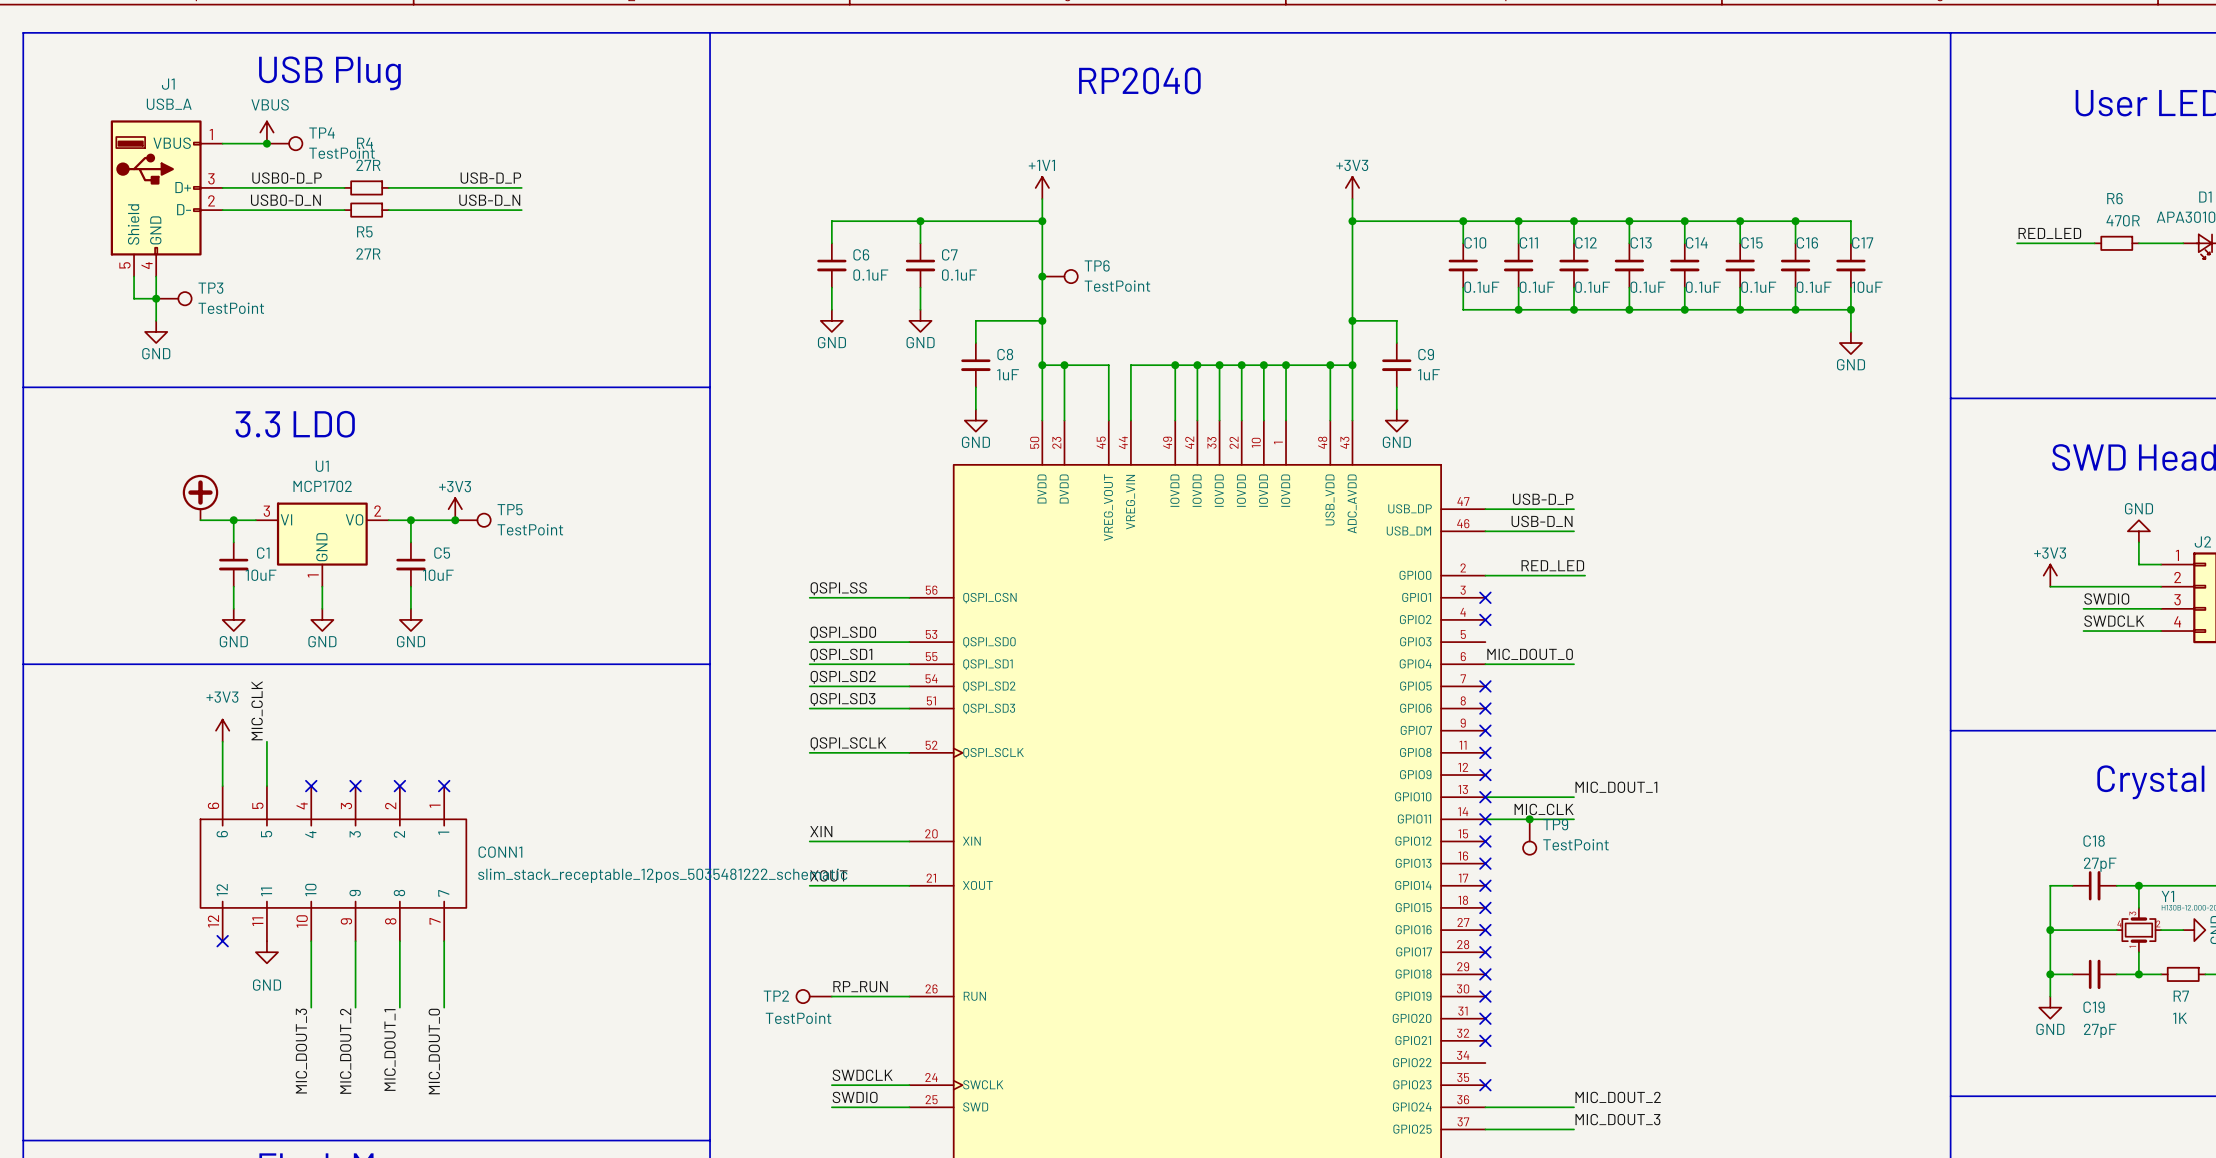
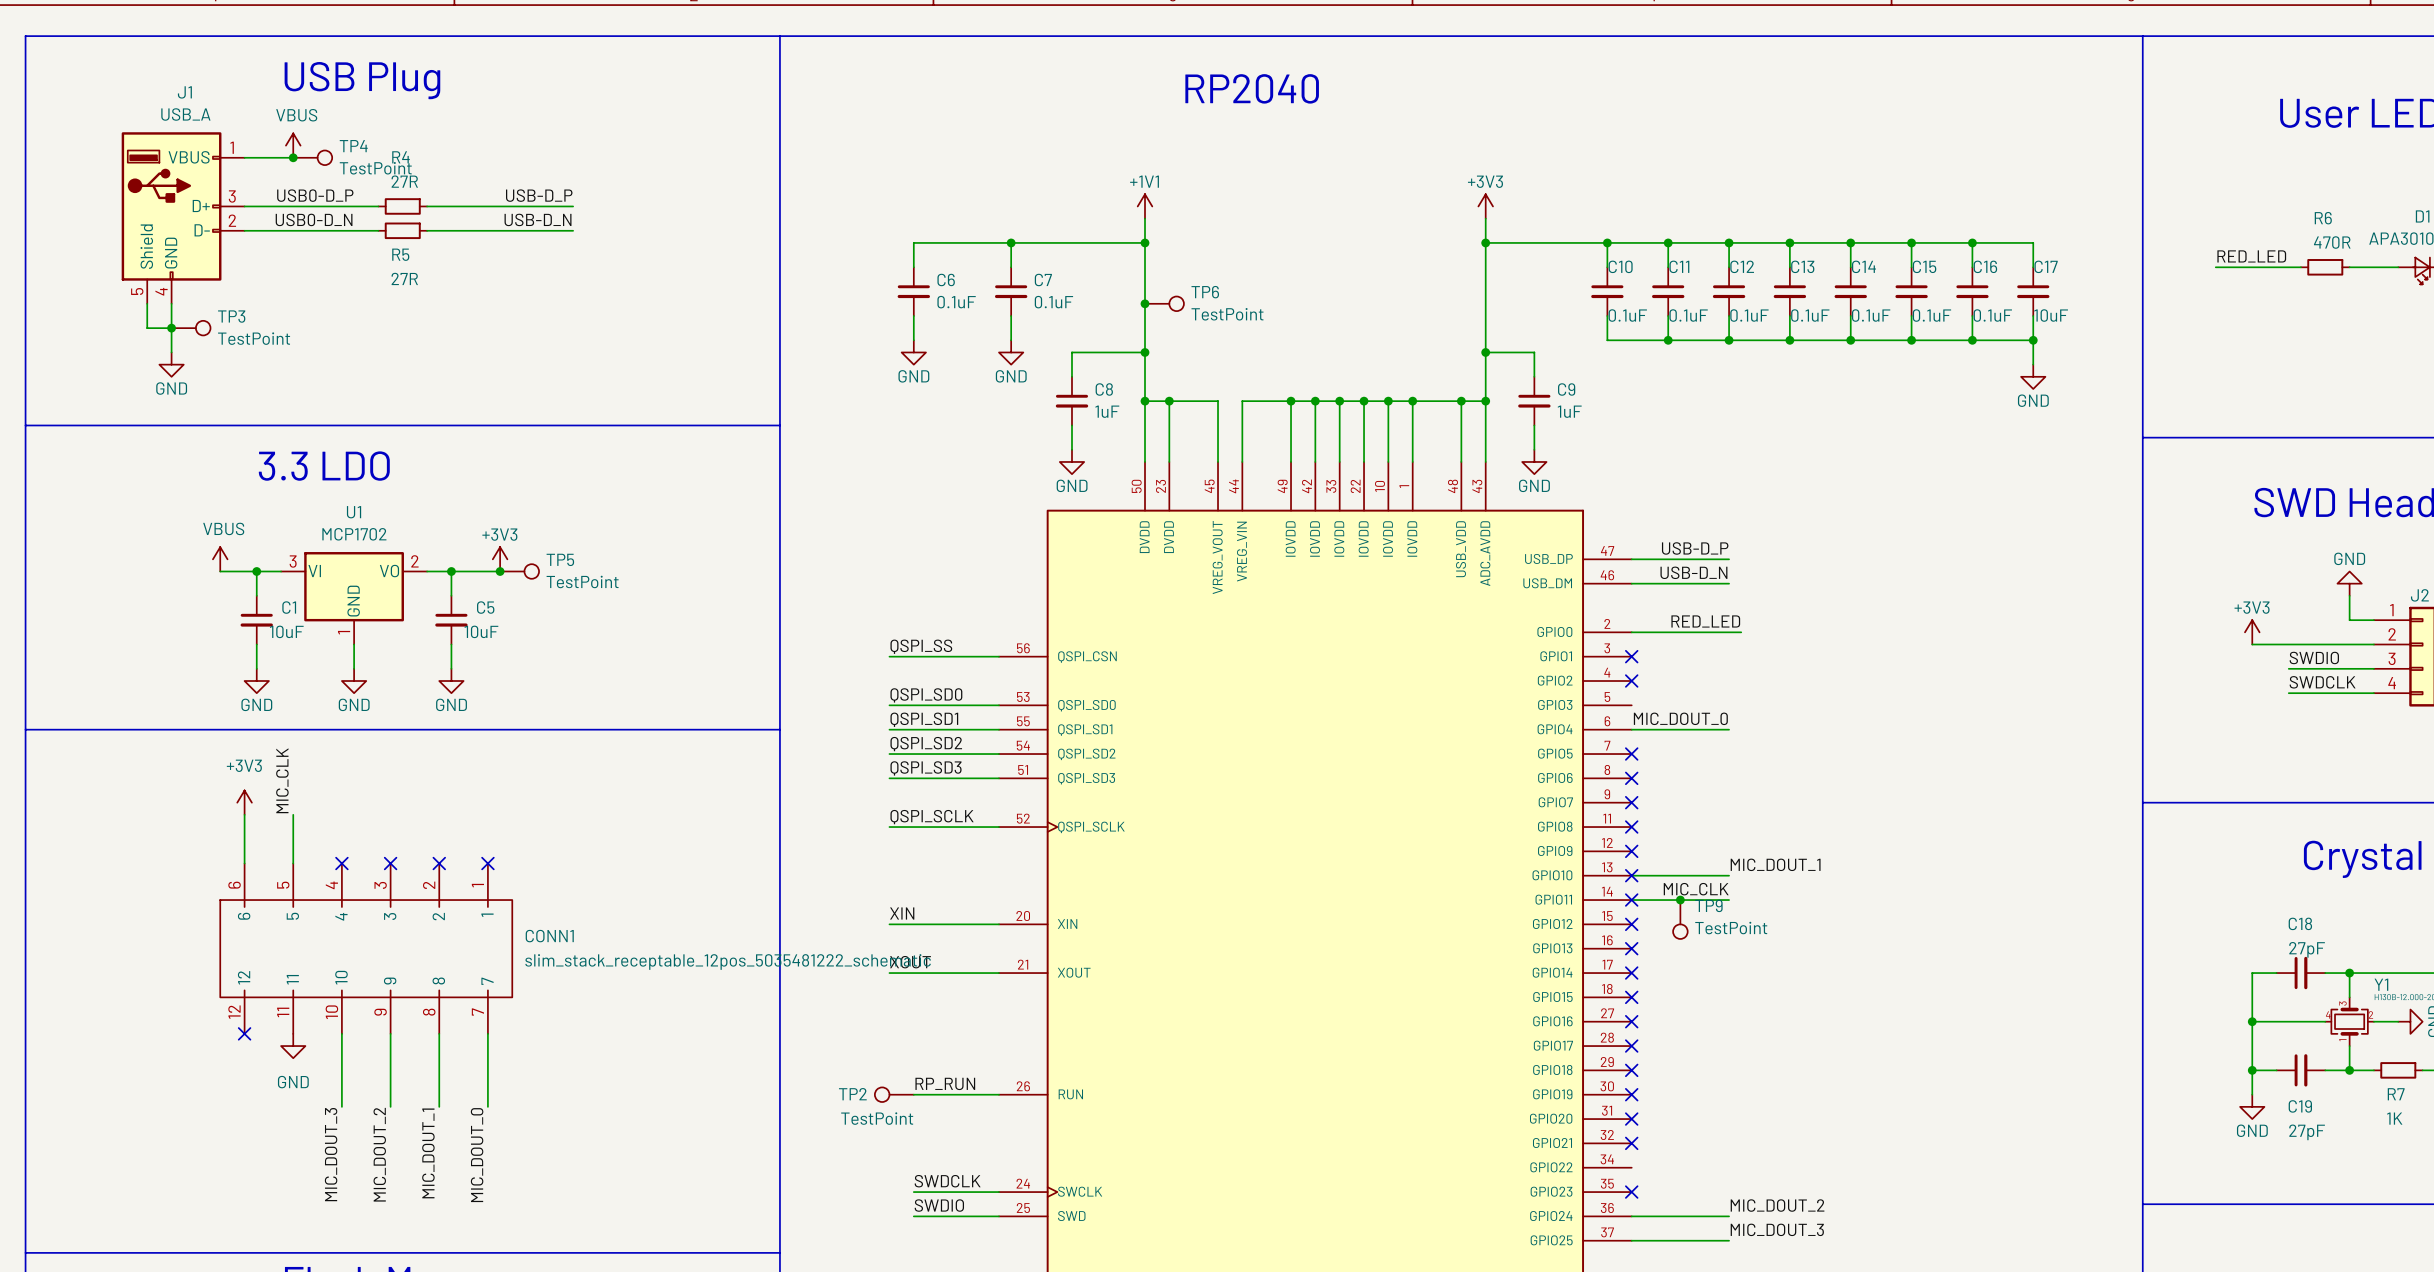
power symbol: (200, 497) -> none
power symbol: none -> VBUS (220, 559)

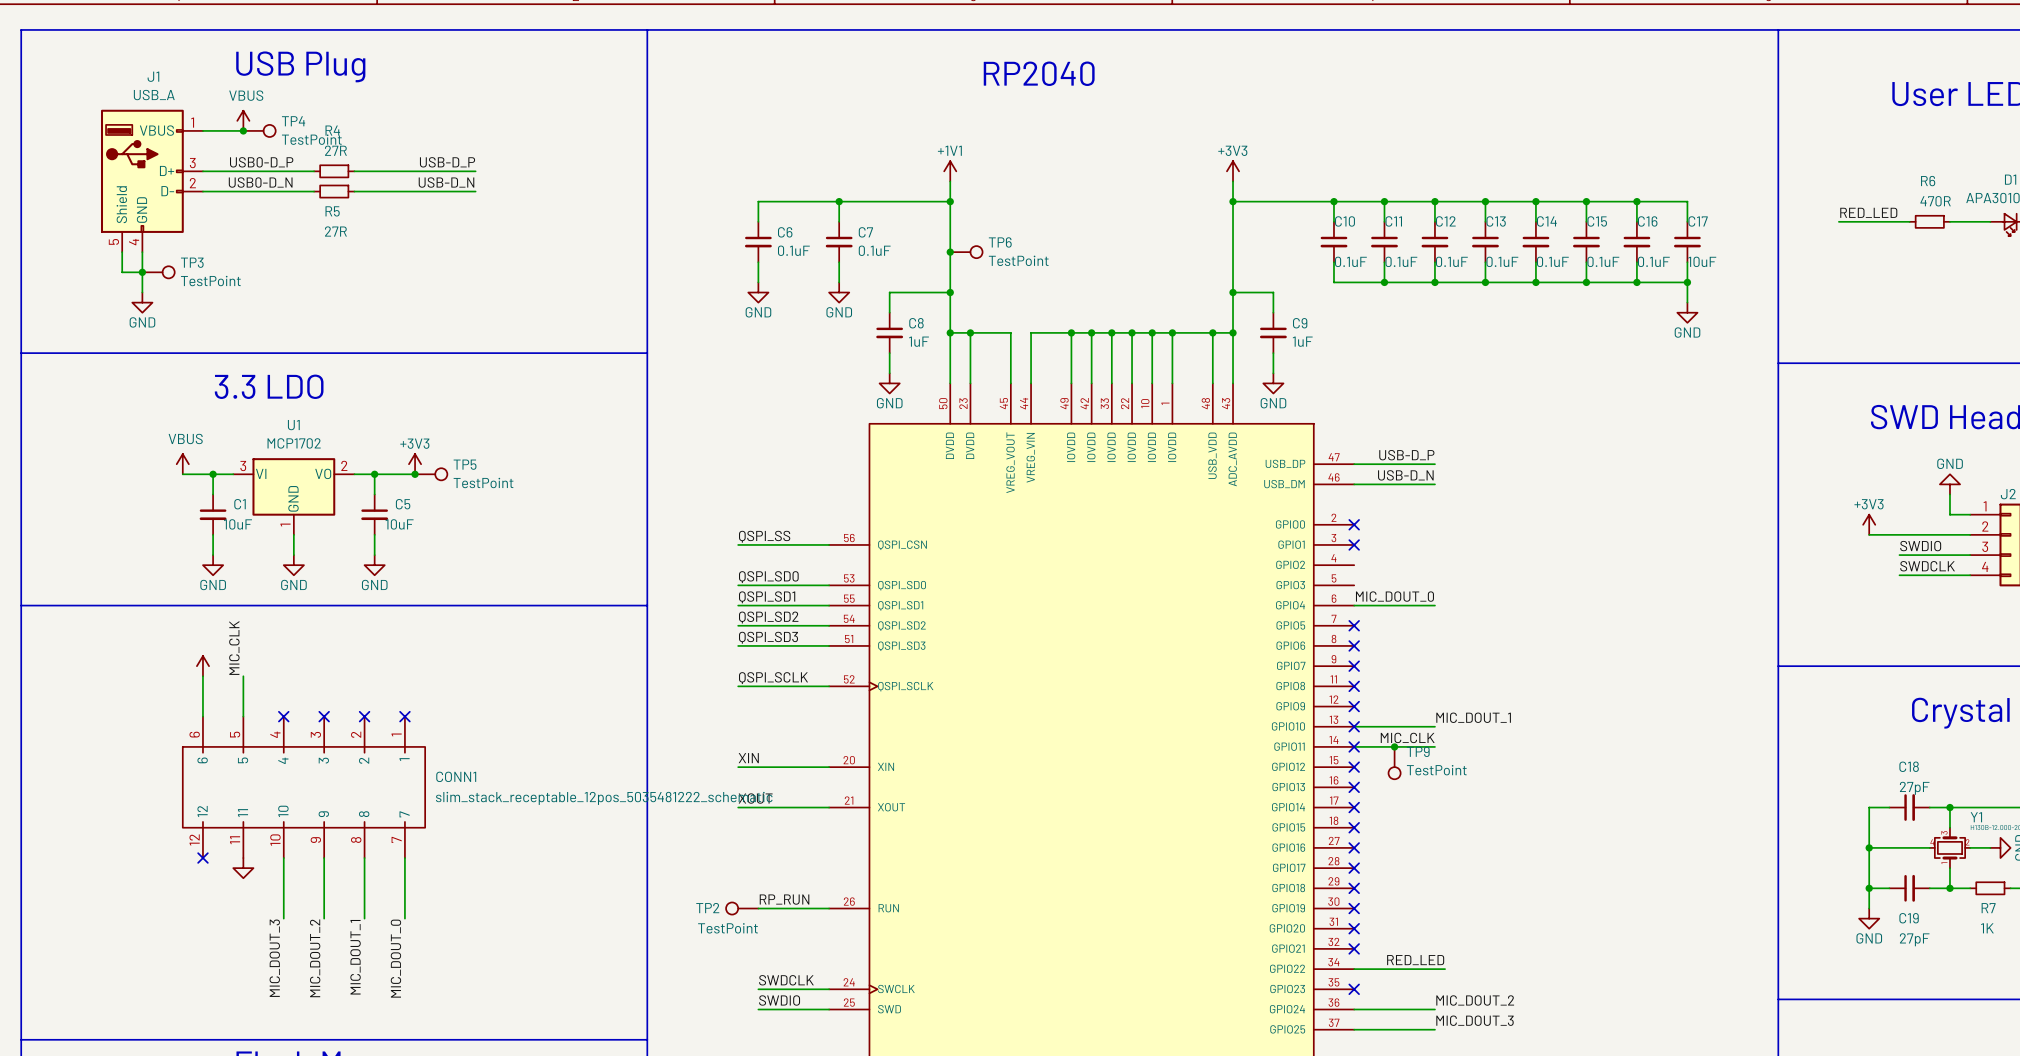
label: RED_LED (1705, 621) -> none
wire: (1631, 632) (1741, 632) -> none
no-connect mark position: (1631, 681) -> (1354, 524)
power symbol text: +3V3 (244, 765) -> none
power symbol text: GND (293, 1082) -> none
label: none -> RED_LED (1415, 960)
wire: none -> (1354, 969) (1445, 969)

